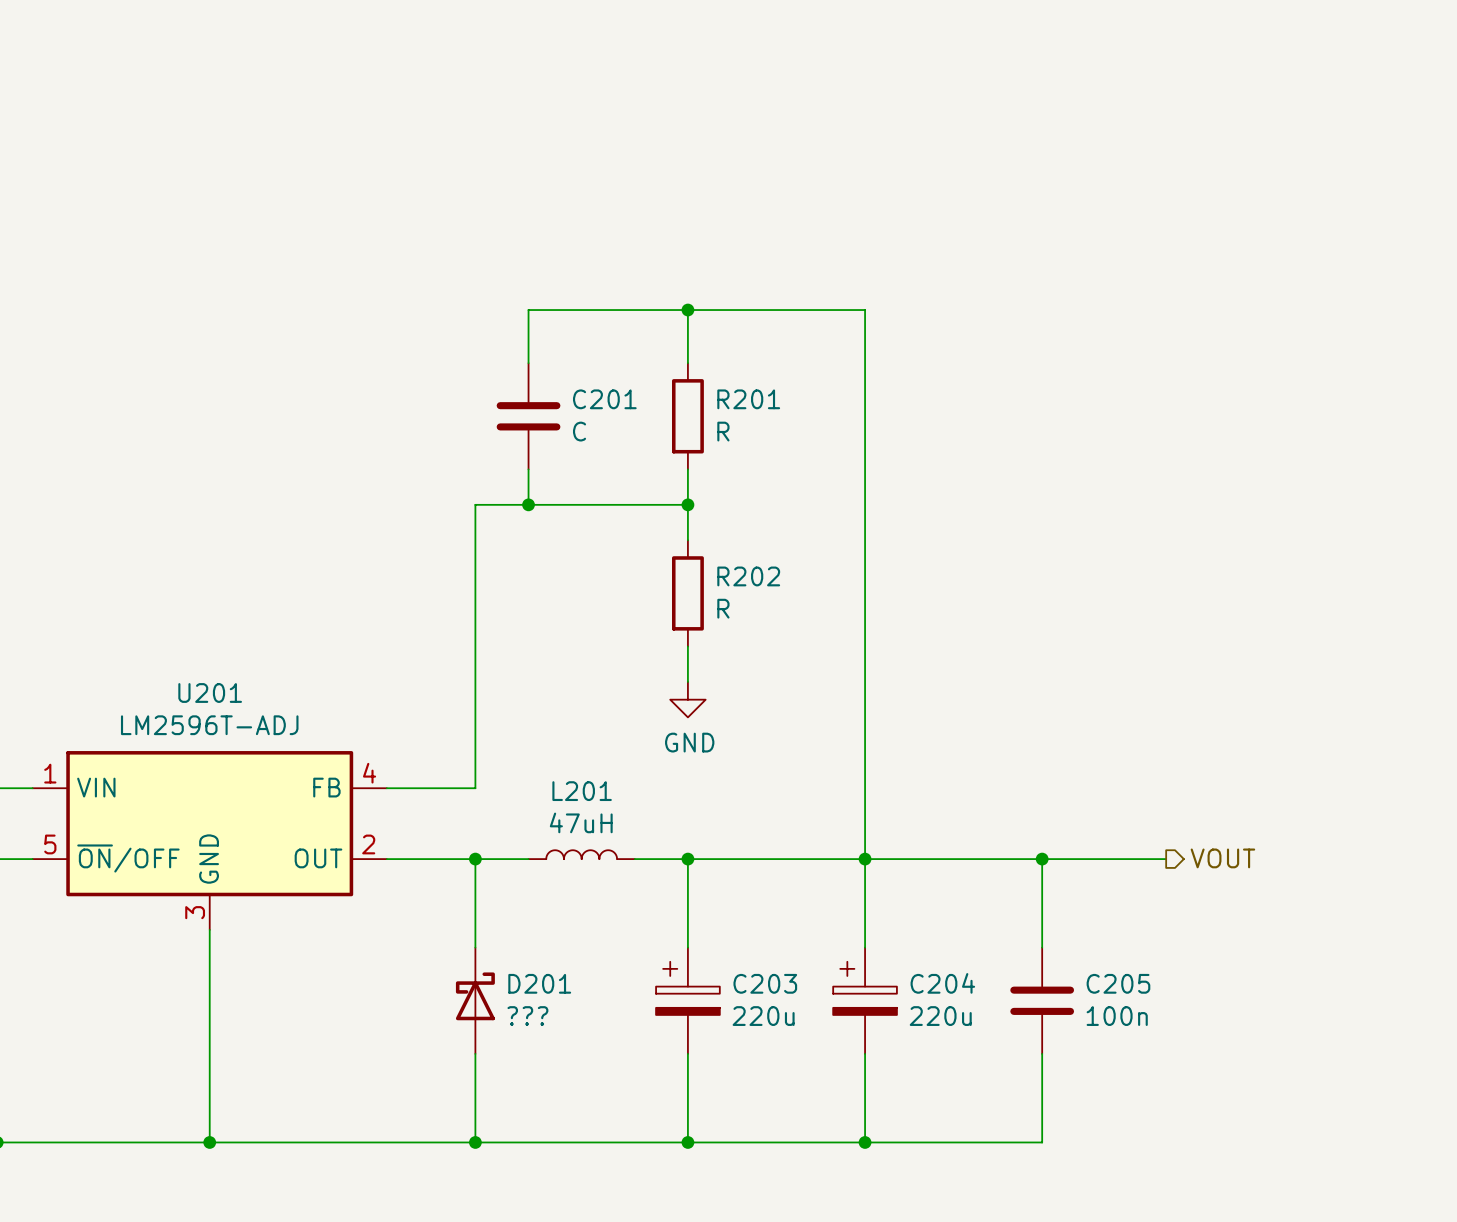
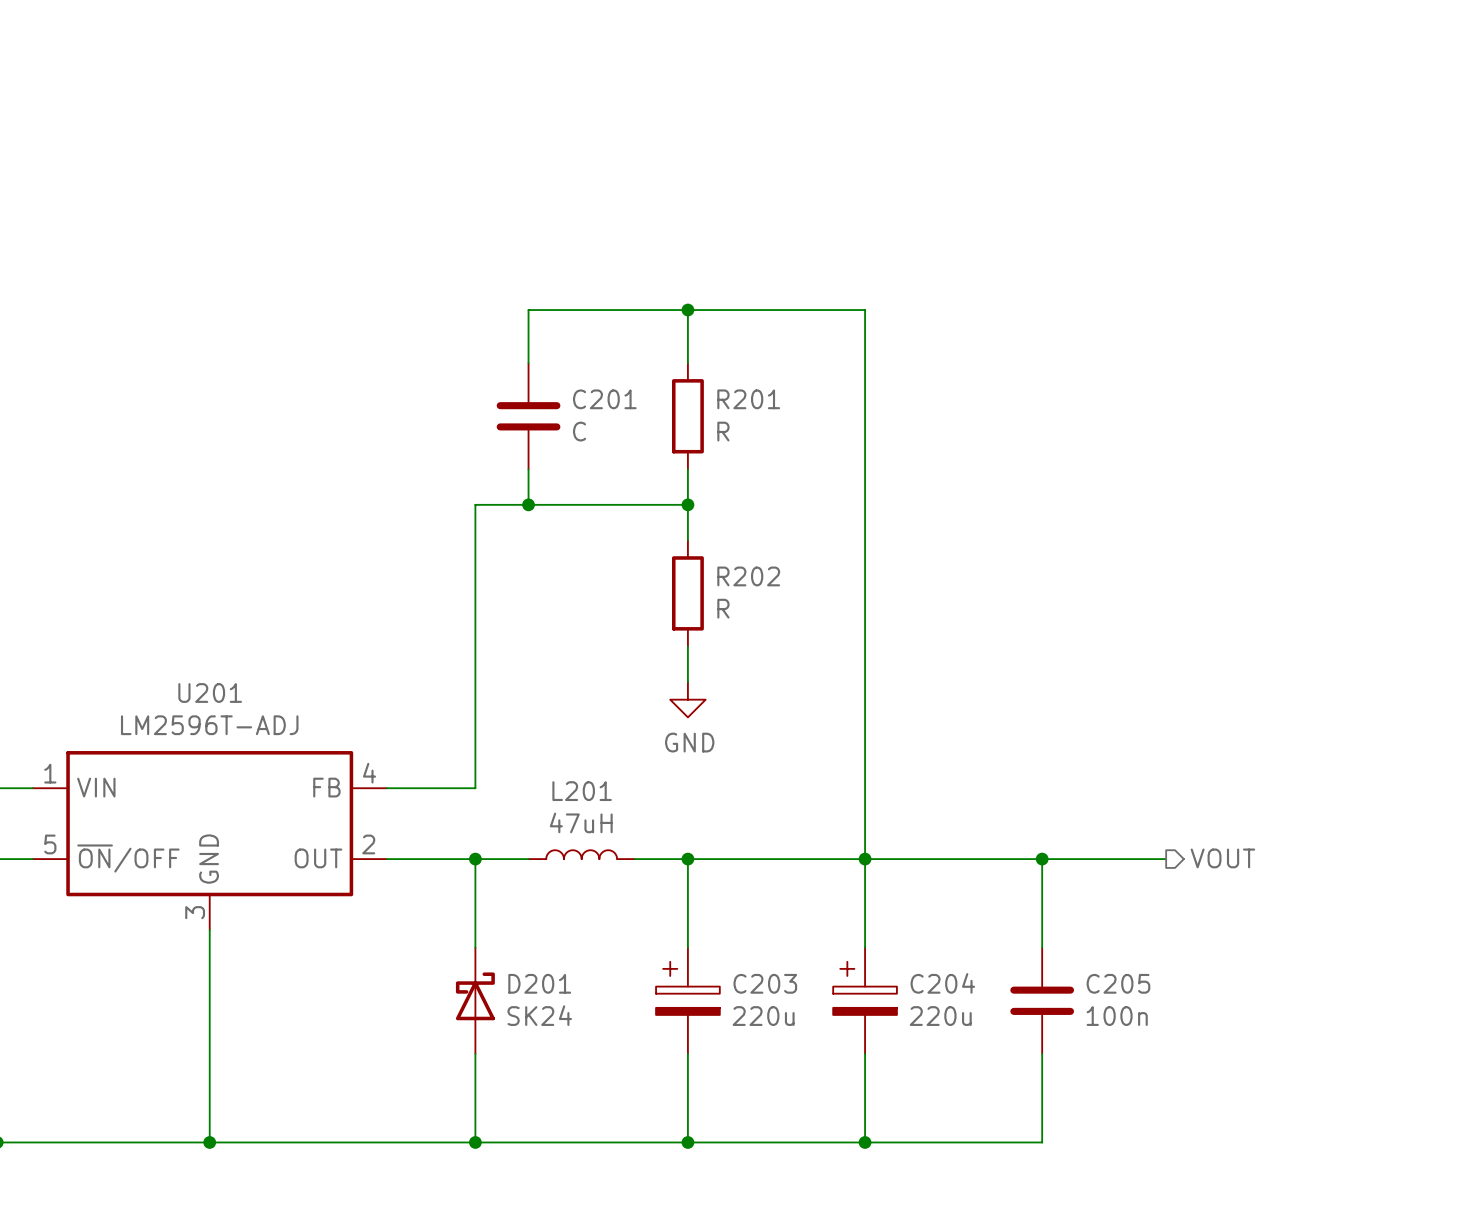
D201 value: ??? (527, 1016) -> SK24 (539, 1015)

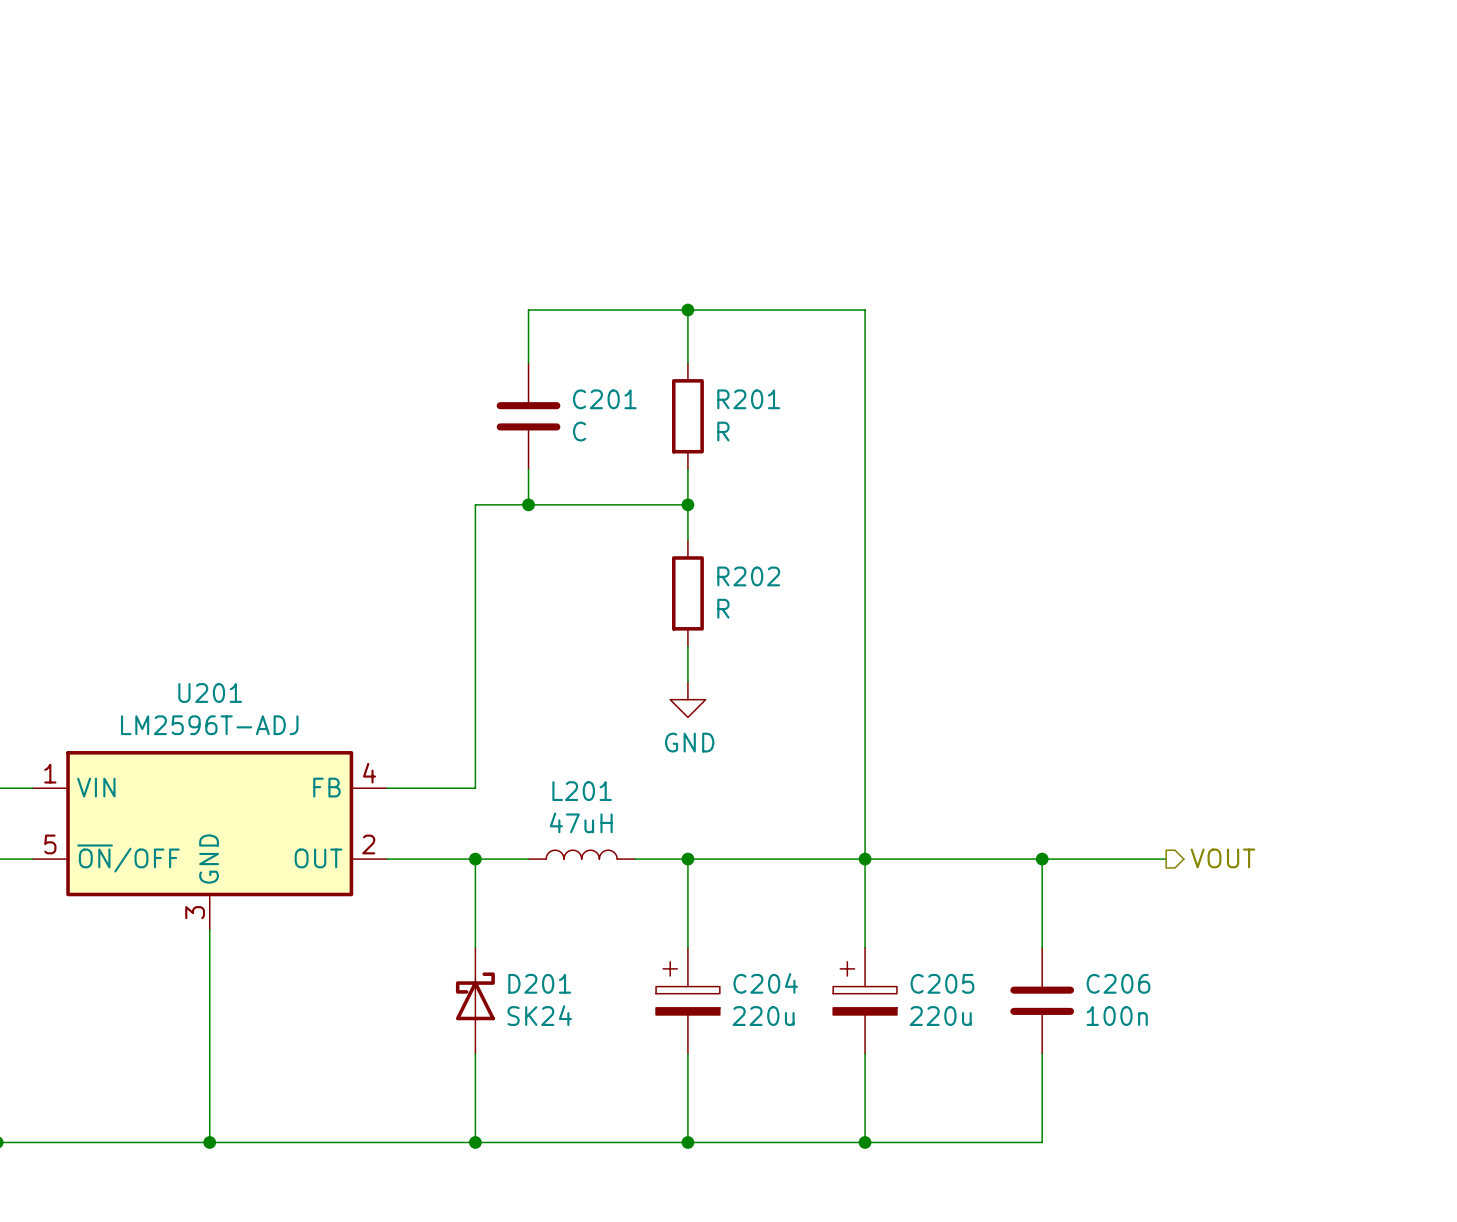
C203 name: C203 (765, 983) -> C204 (765, 983)
C204 name: C204 (942, 983) -> C205 (942, 983)
C205 name: C205 (1118, 983) -> C206 (1118, 983)

